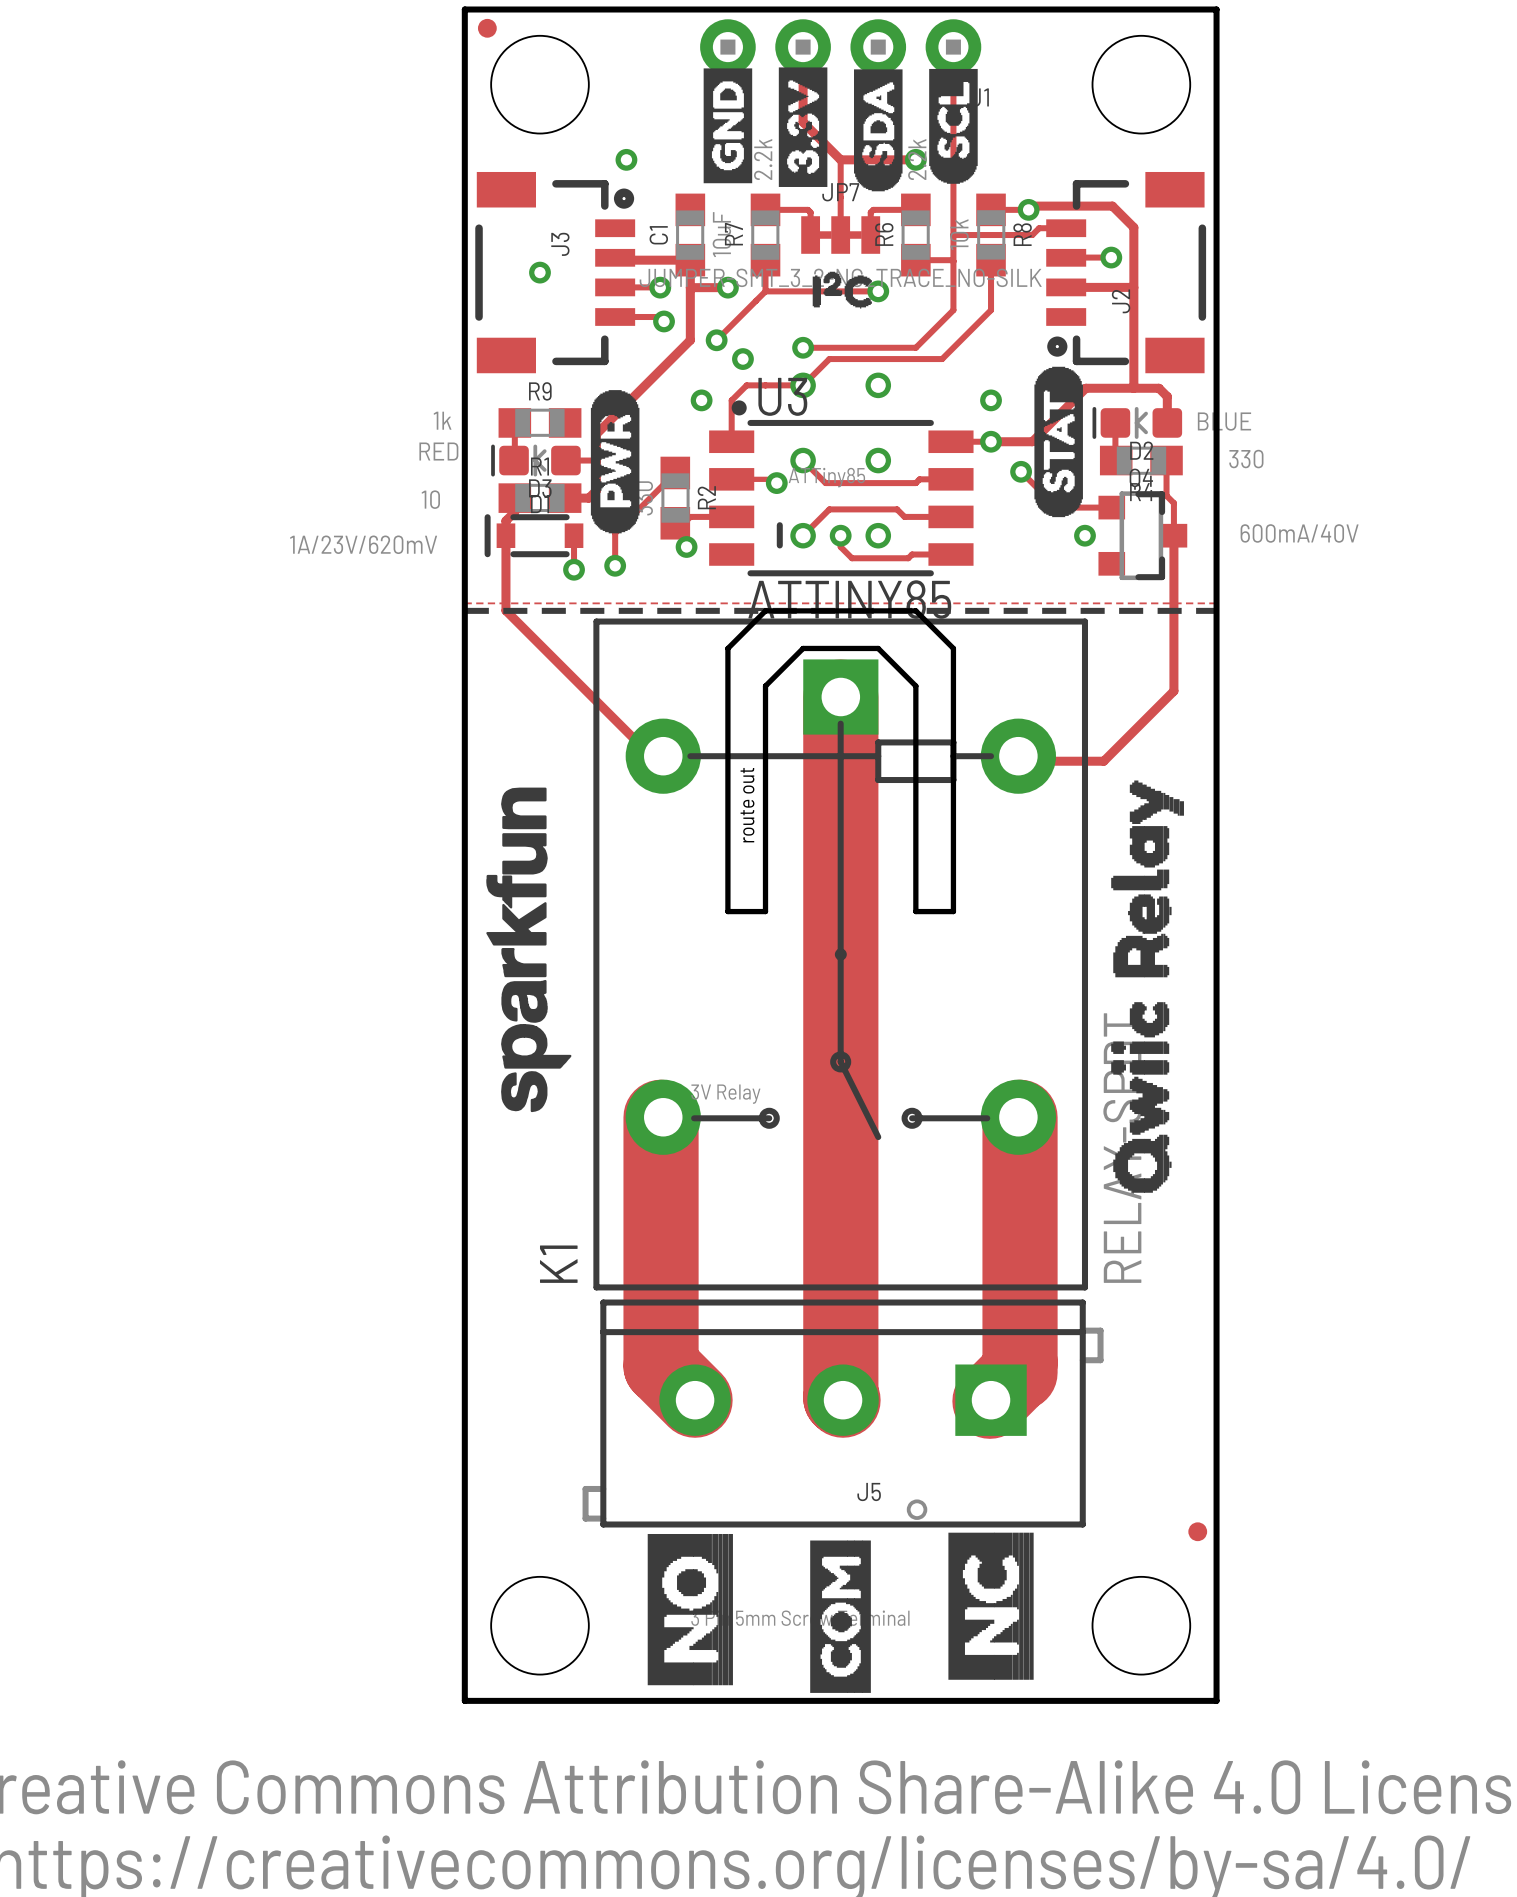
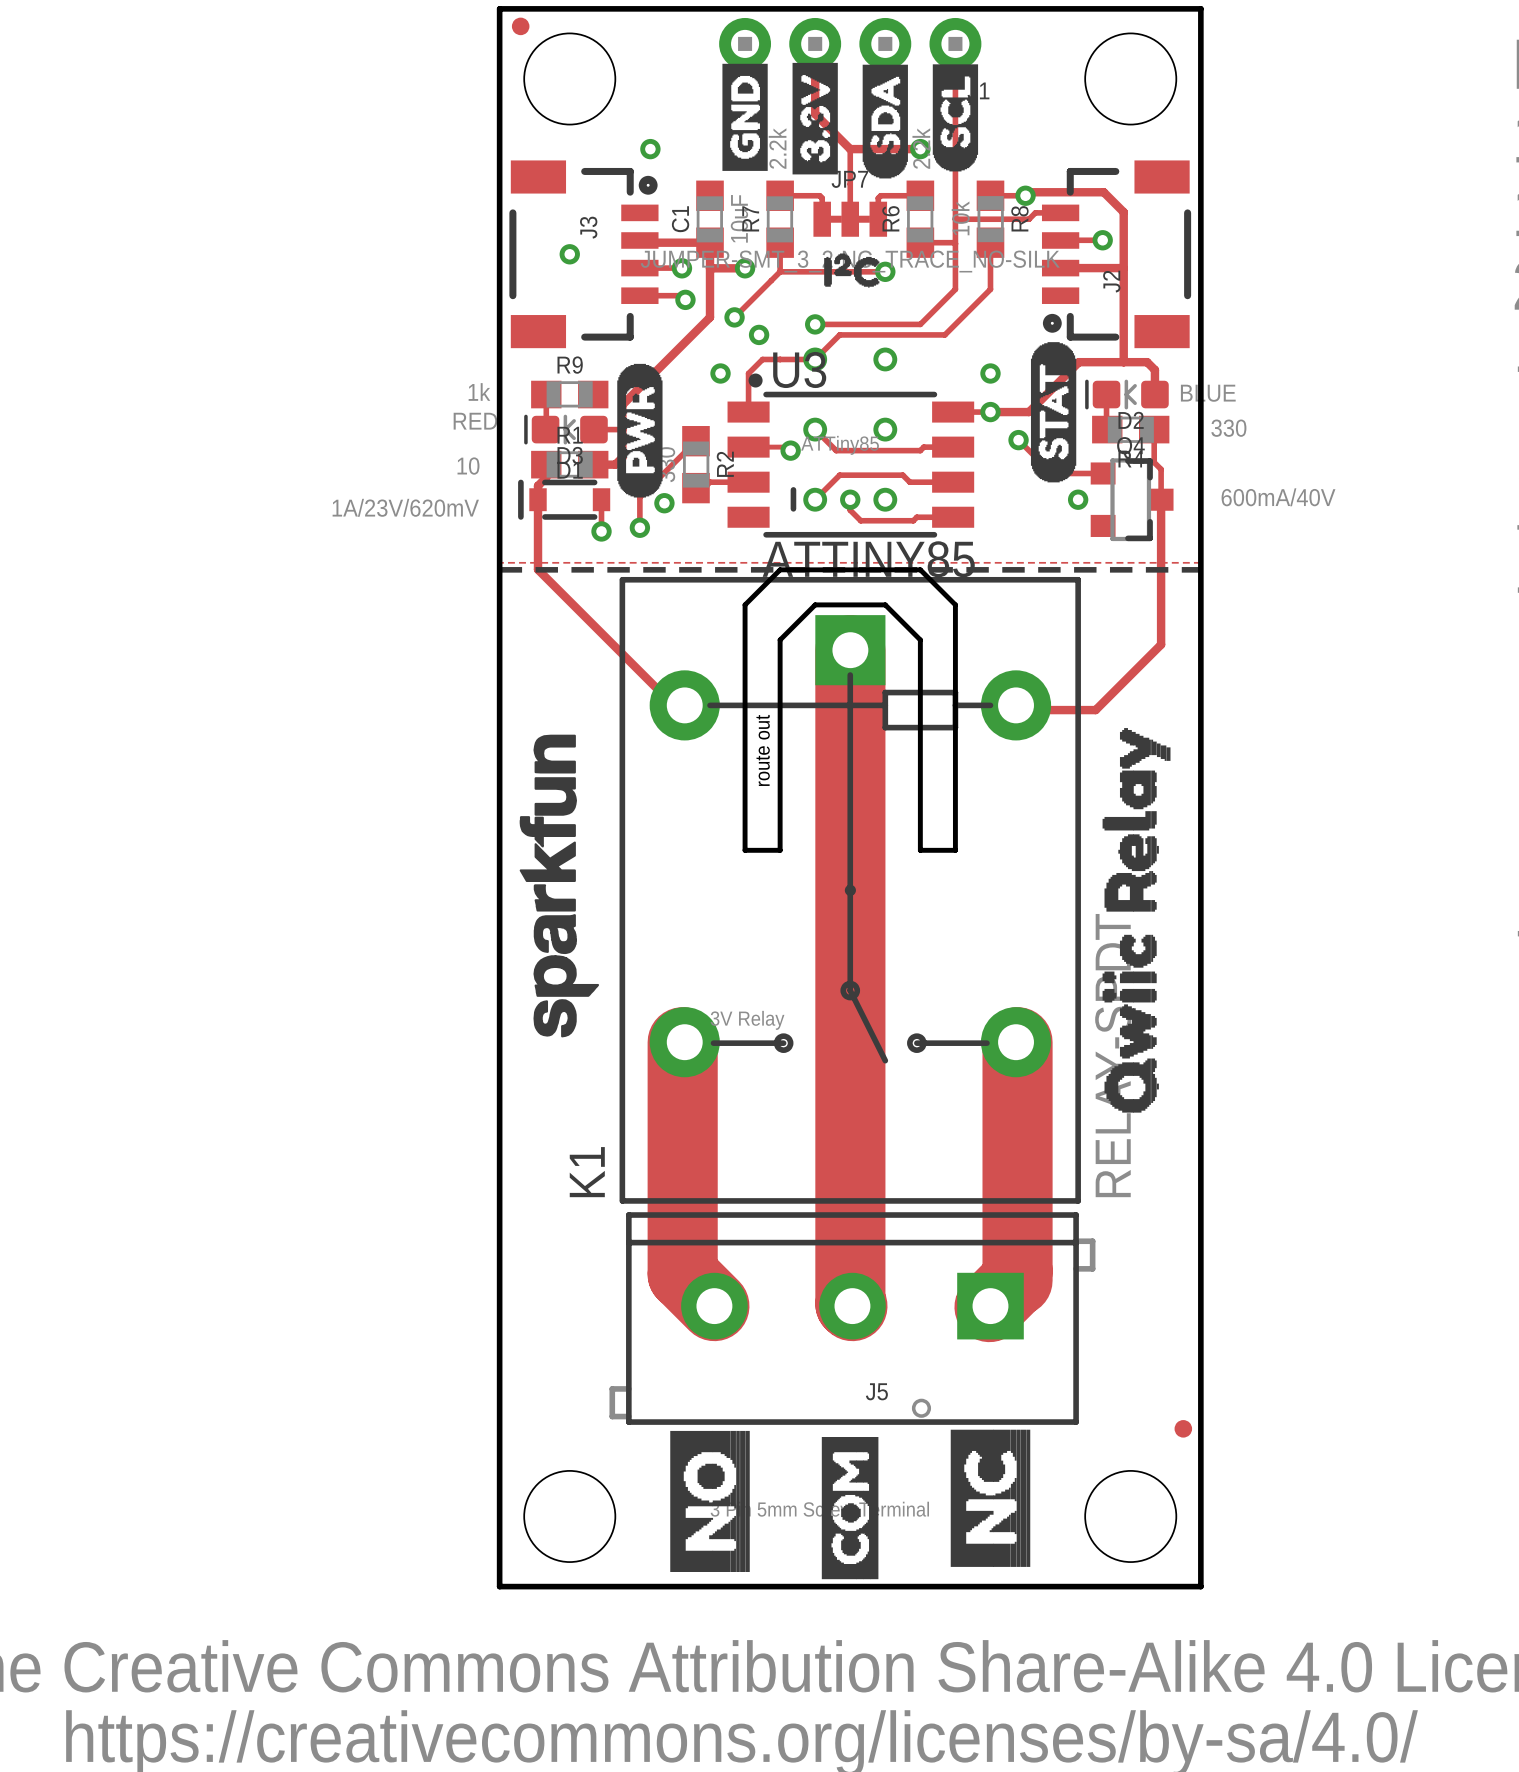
via position: (686, 546) -> (664, 503)

